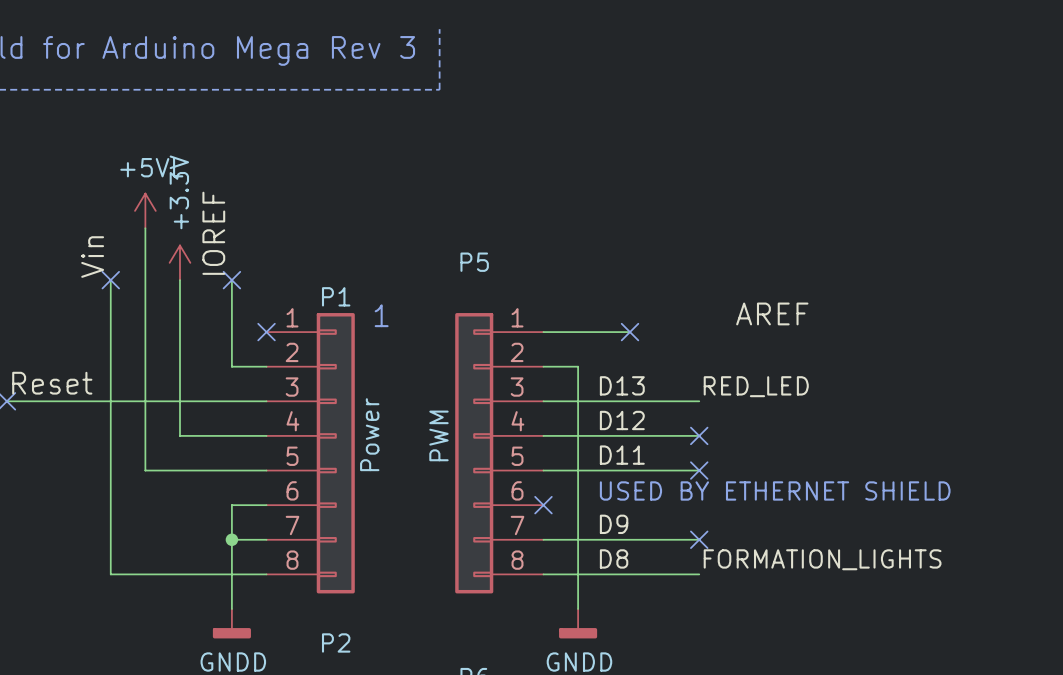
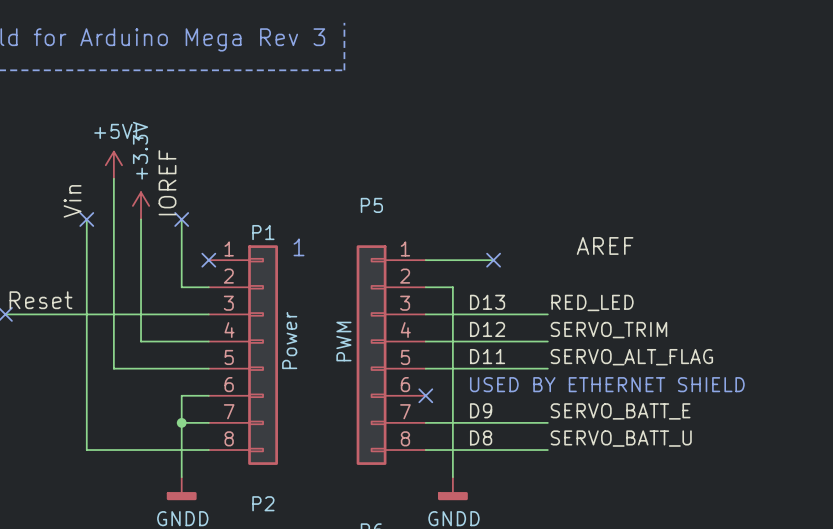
label: none -> SERVO_TRIM (608, 330)
no-connect mark: (699, 435) -> none
label: none -> SERVO_ALT_FLAG (631, 357)
no-connect mark: (699, 470) -> none
label: none -> SERVO_BATT_E (620, 411)
no-connect mark: (699, 539) -> none
label: FORMATION_LIGHTS (822, 559) -> SERVO_BATT_U (621, 438)

